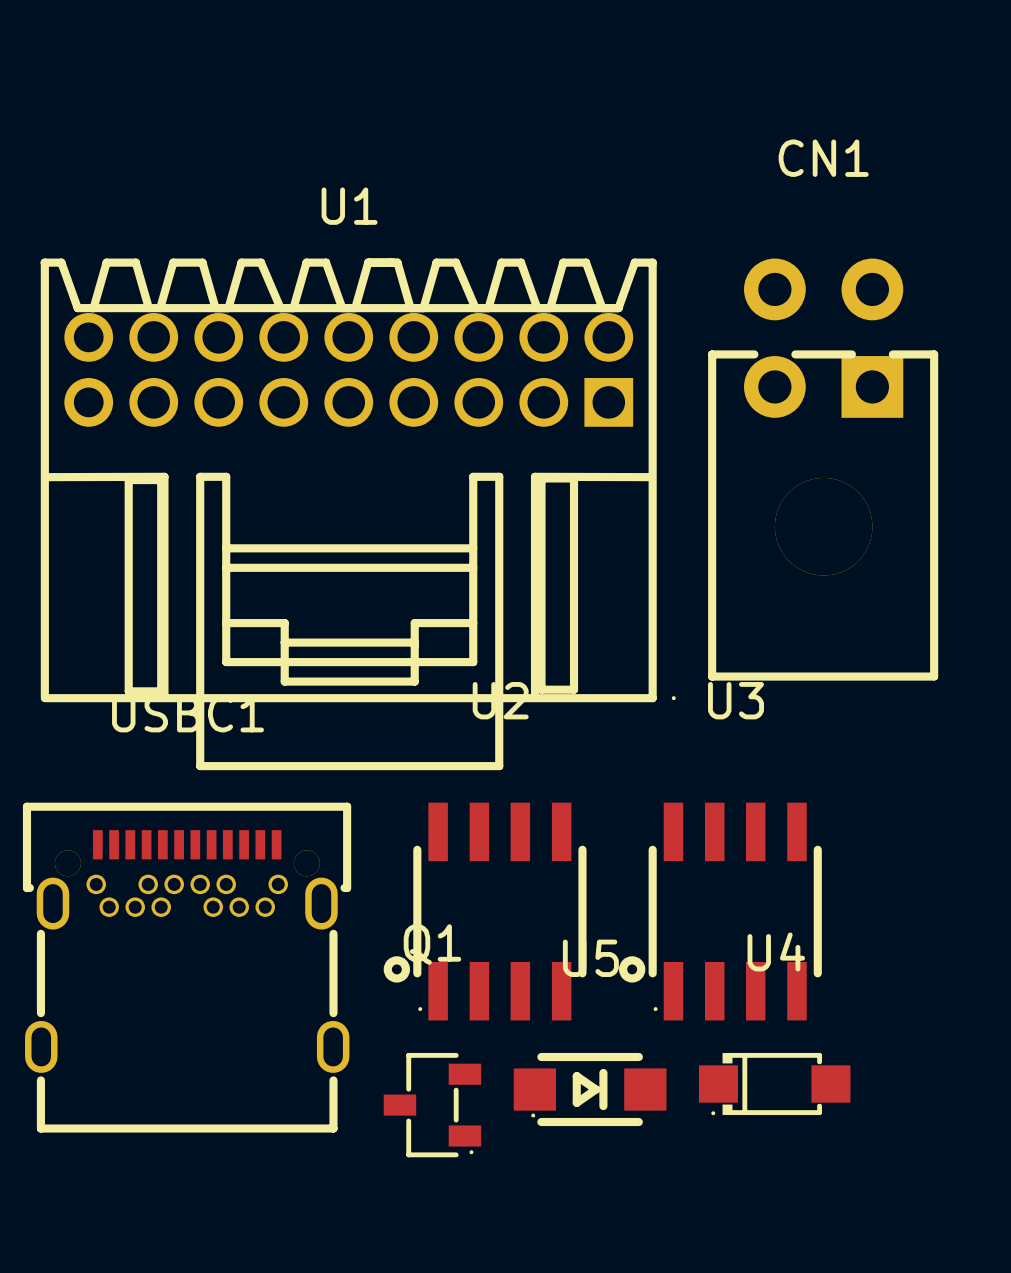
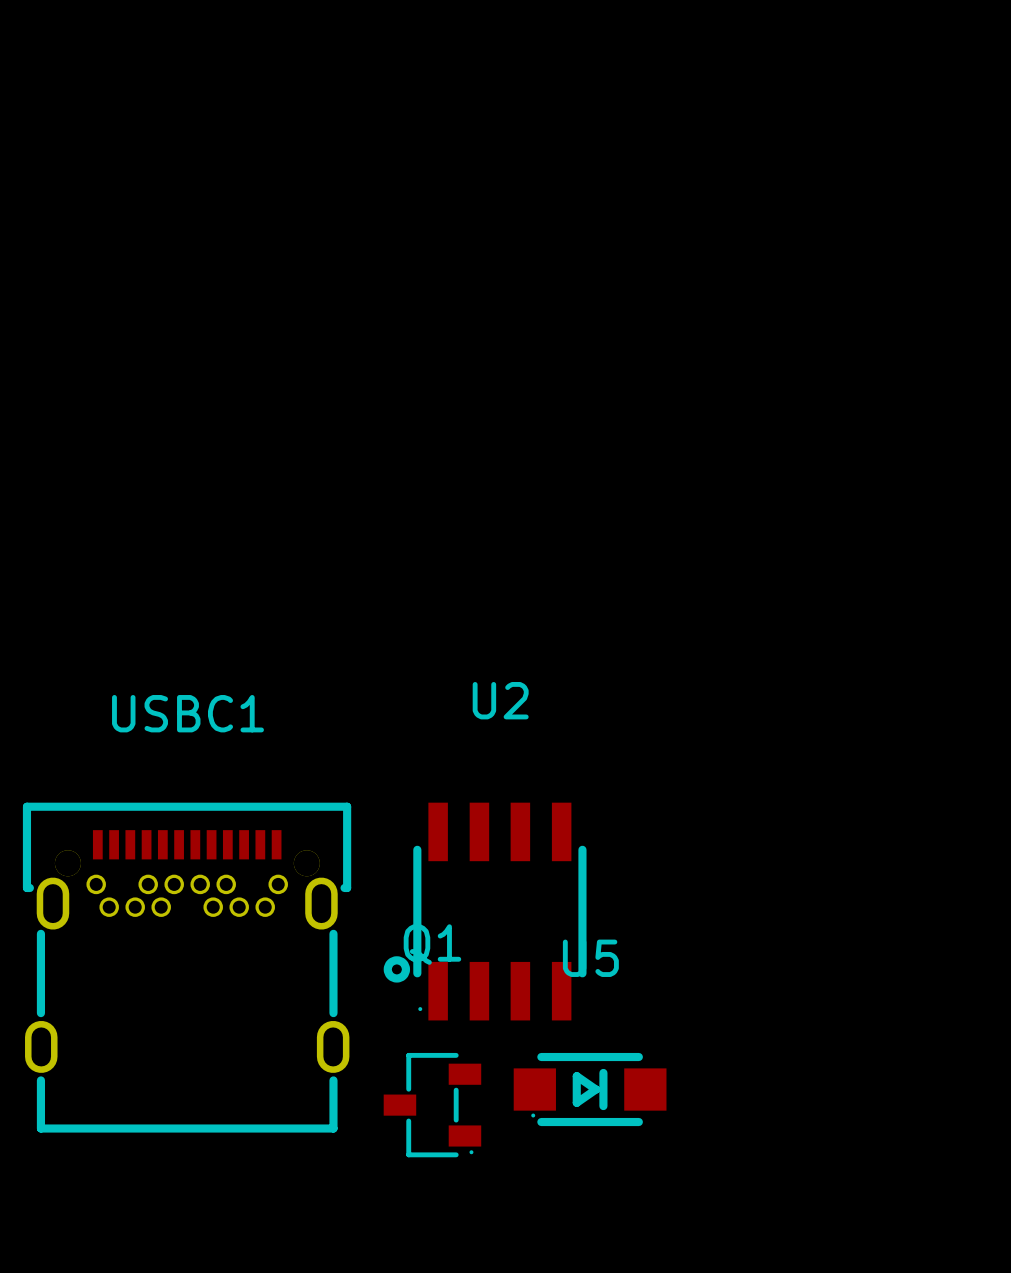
CN1: (823, 469) -> none
U1: (358, 514) -> none
U3: (720, 911) -> none
U4: (774, 1084) -> none

